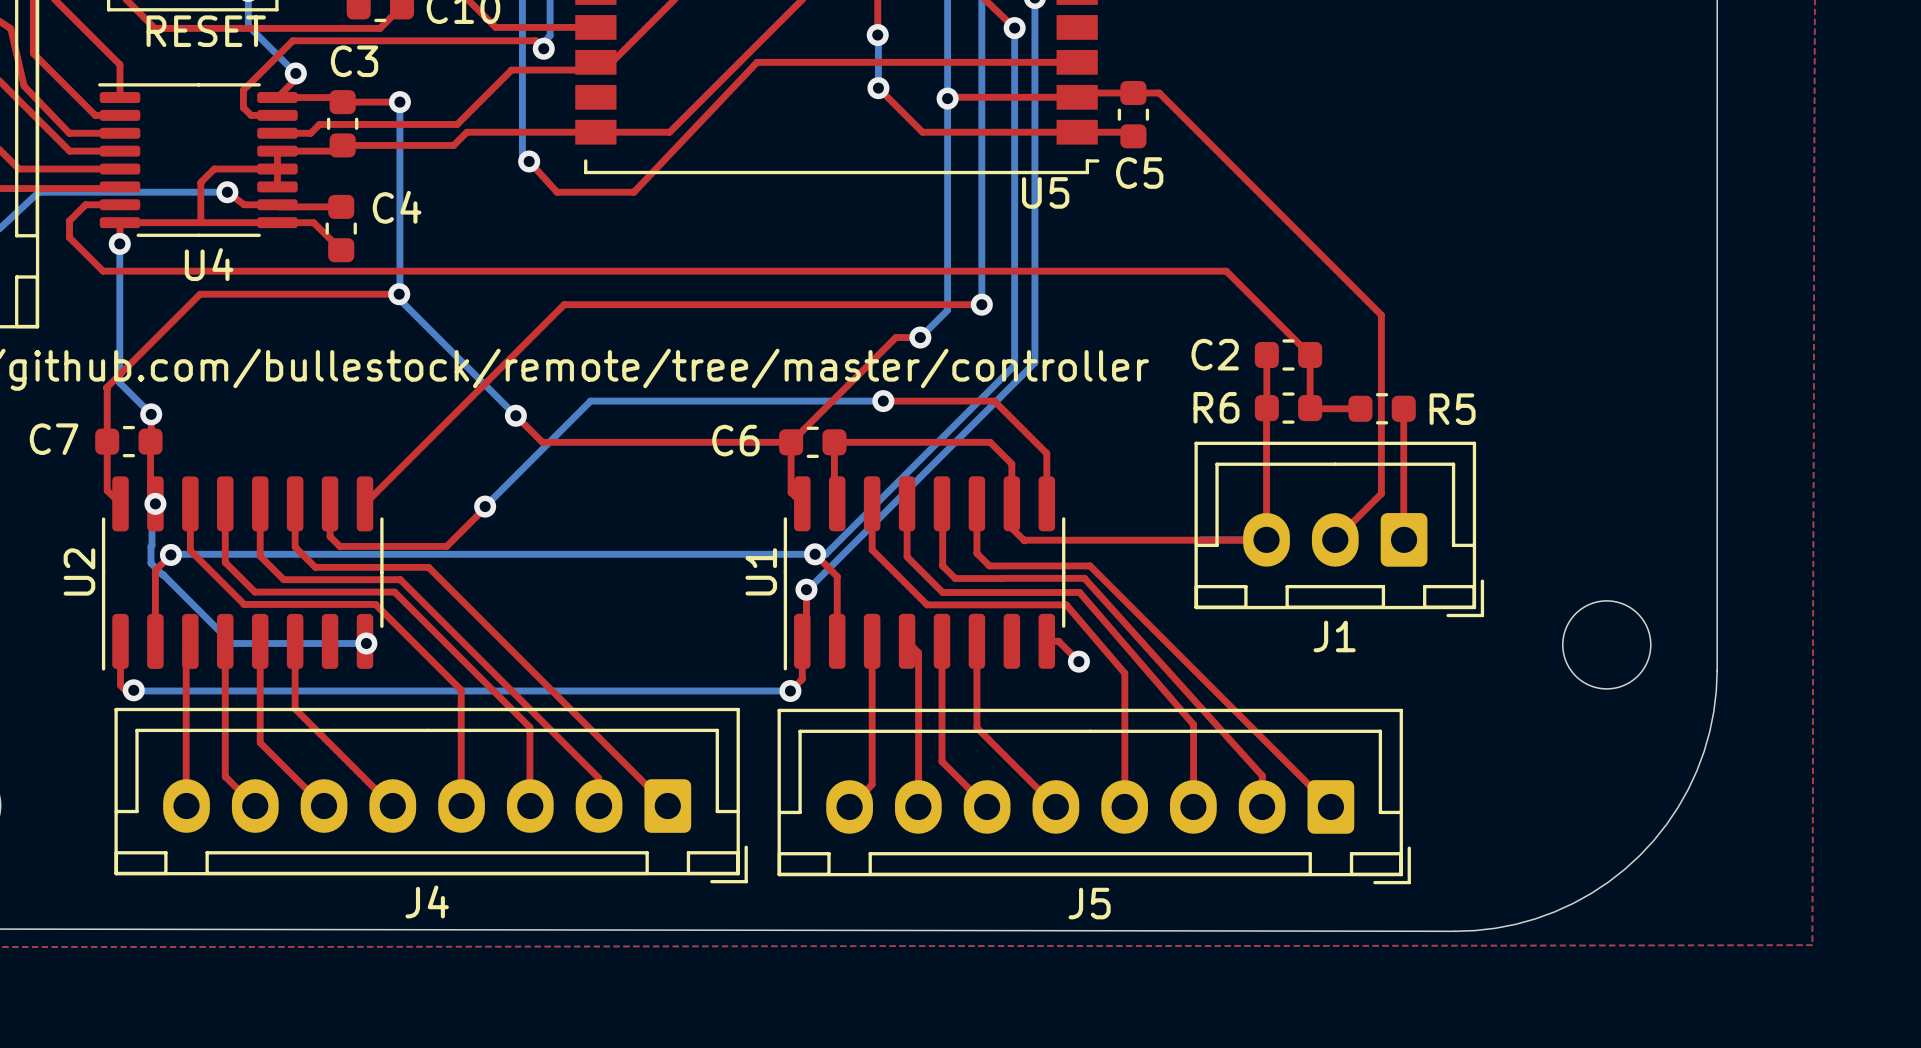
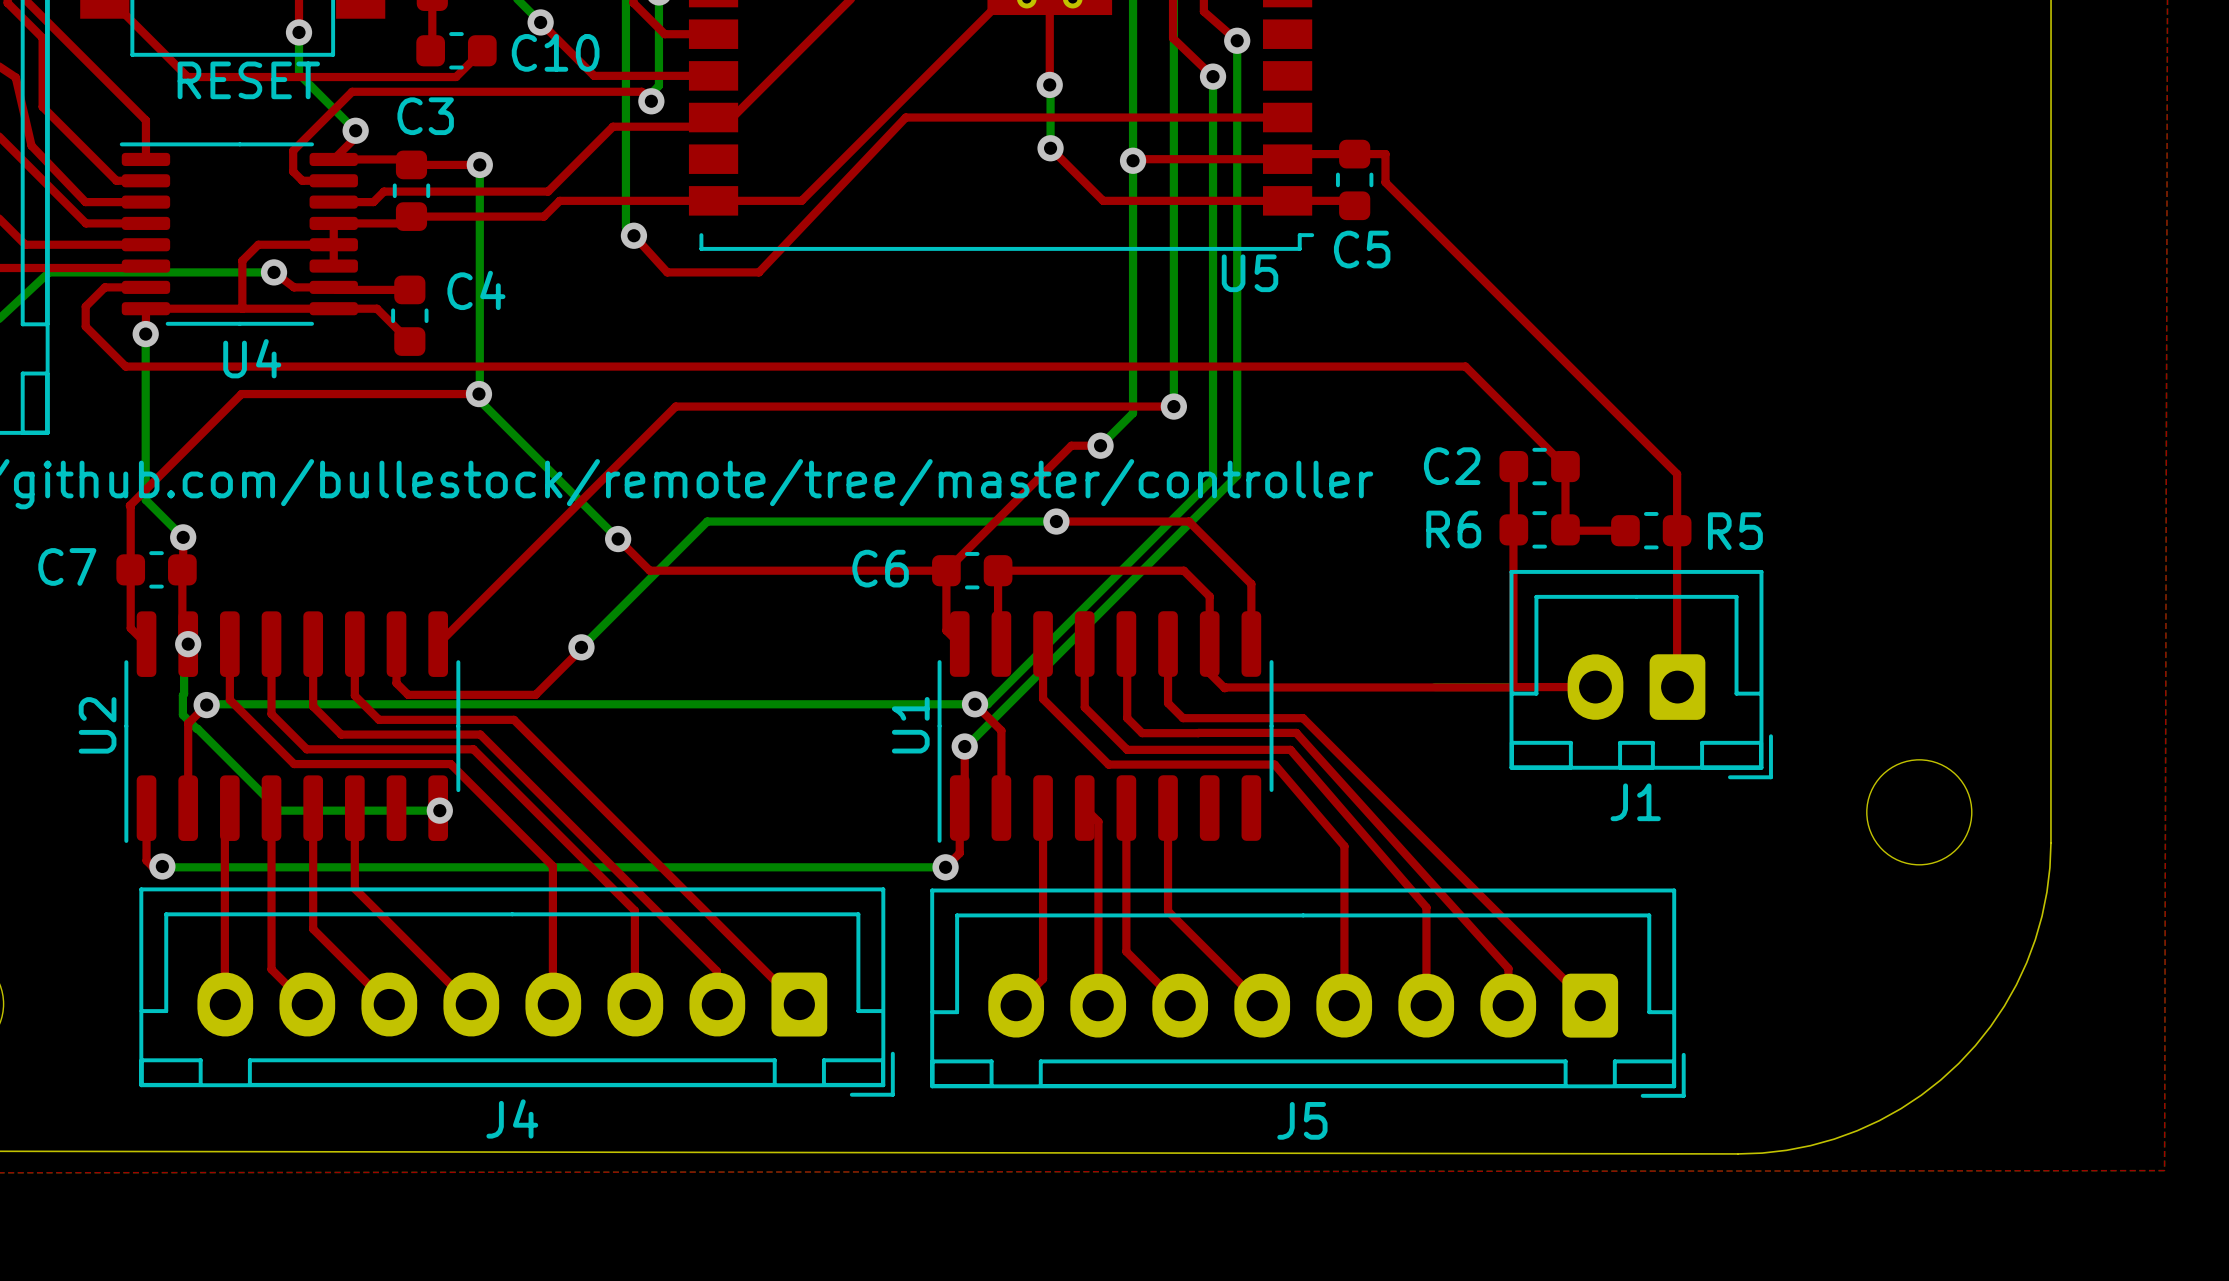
top track: (1159, 93) (1381, 315) (1381, 493) (1335, 539) -> (1385, 154) (1385, 182) (1677, 474) (1677, 530)
J1 footprint: [1194, 441, 1485, 618] -> [1509, 569, 1773, 780]
top track: none -> (1513, 687) (1595, 687)
top track: (1046, 641) (1058, 641) (1078, 661) -> none
via: (1078, 661) -> none

